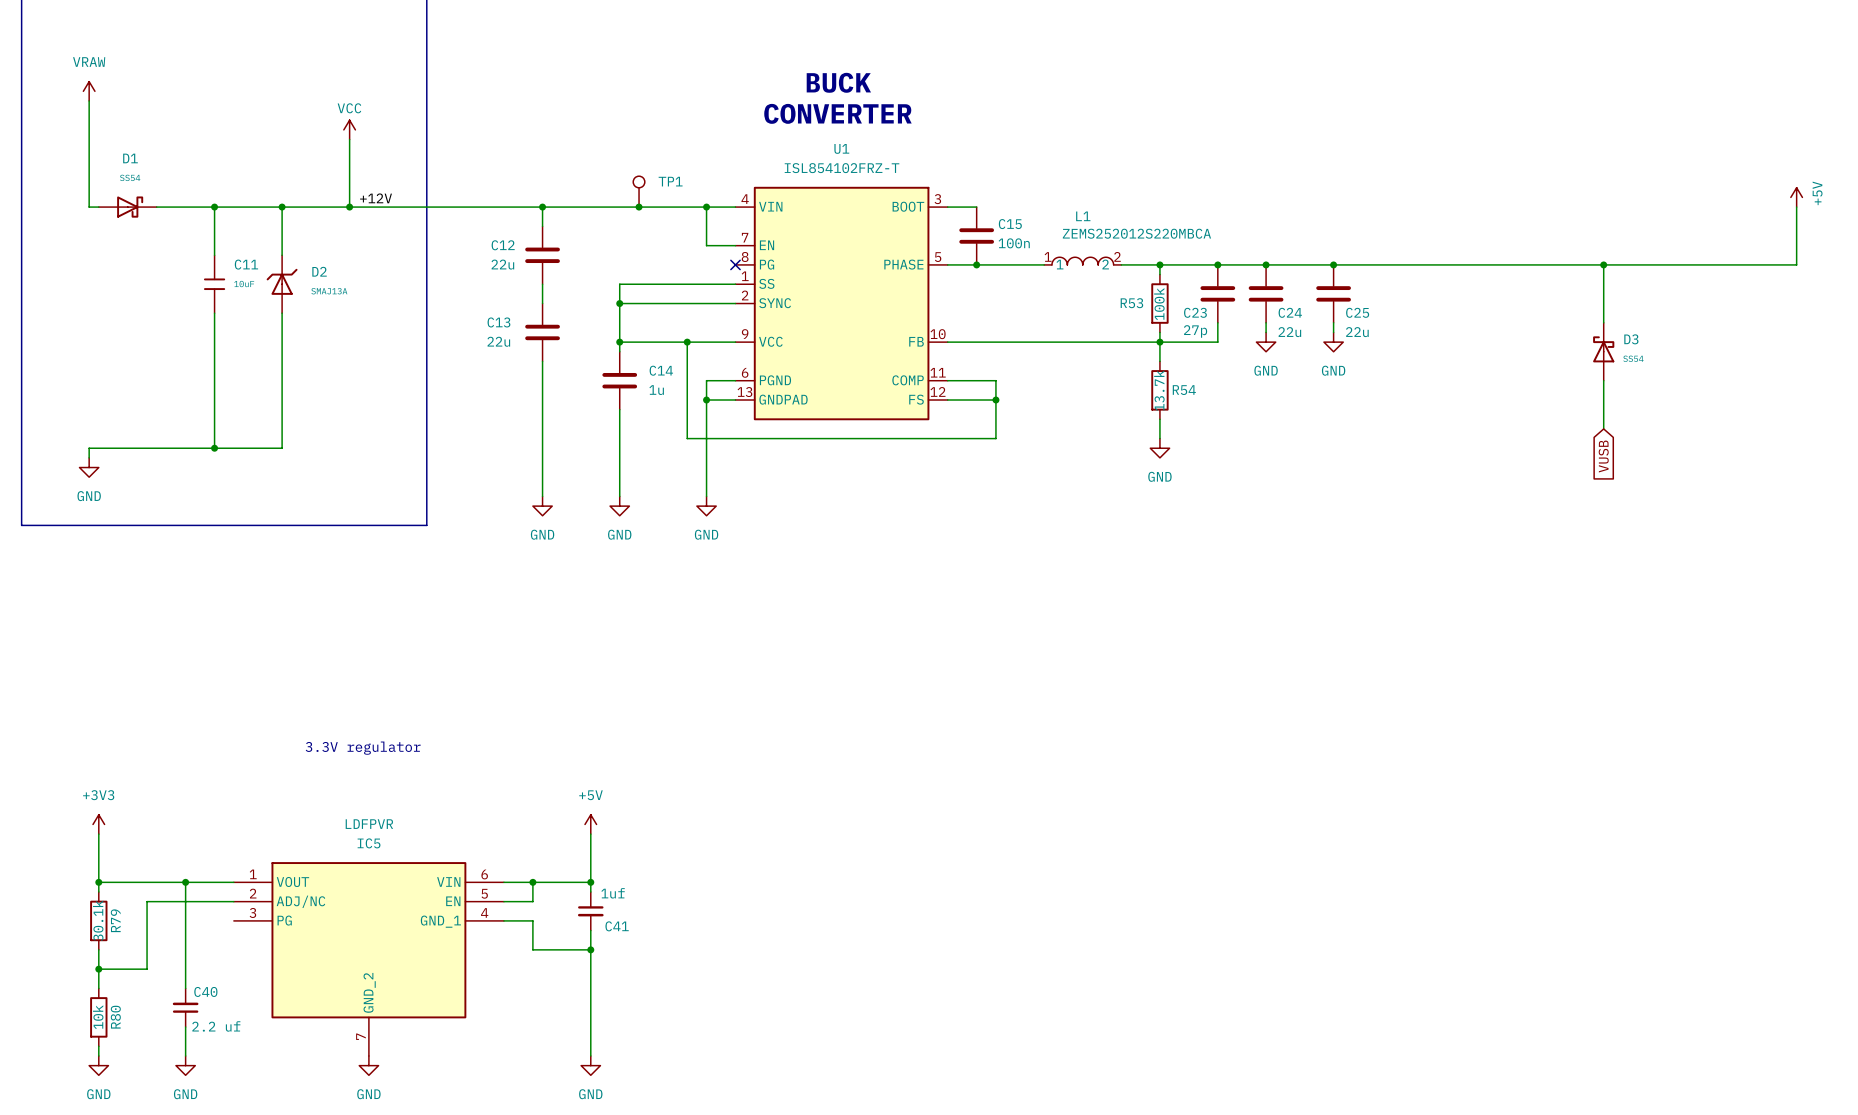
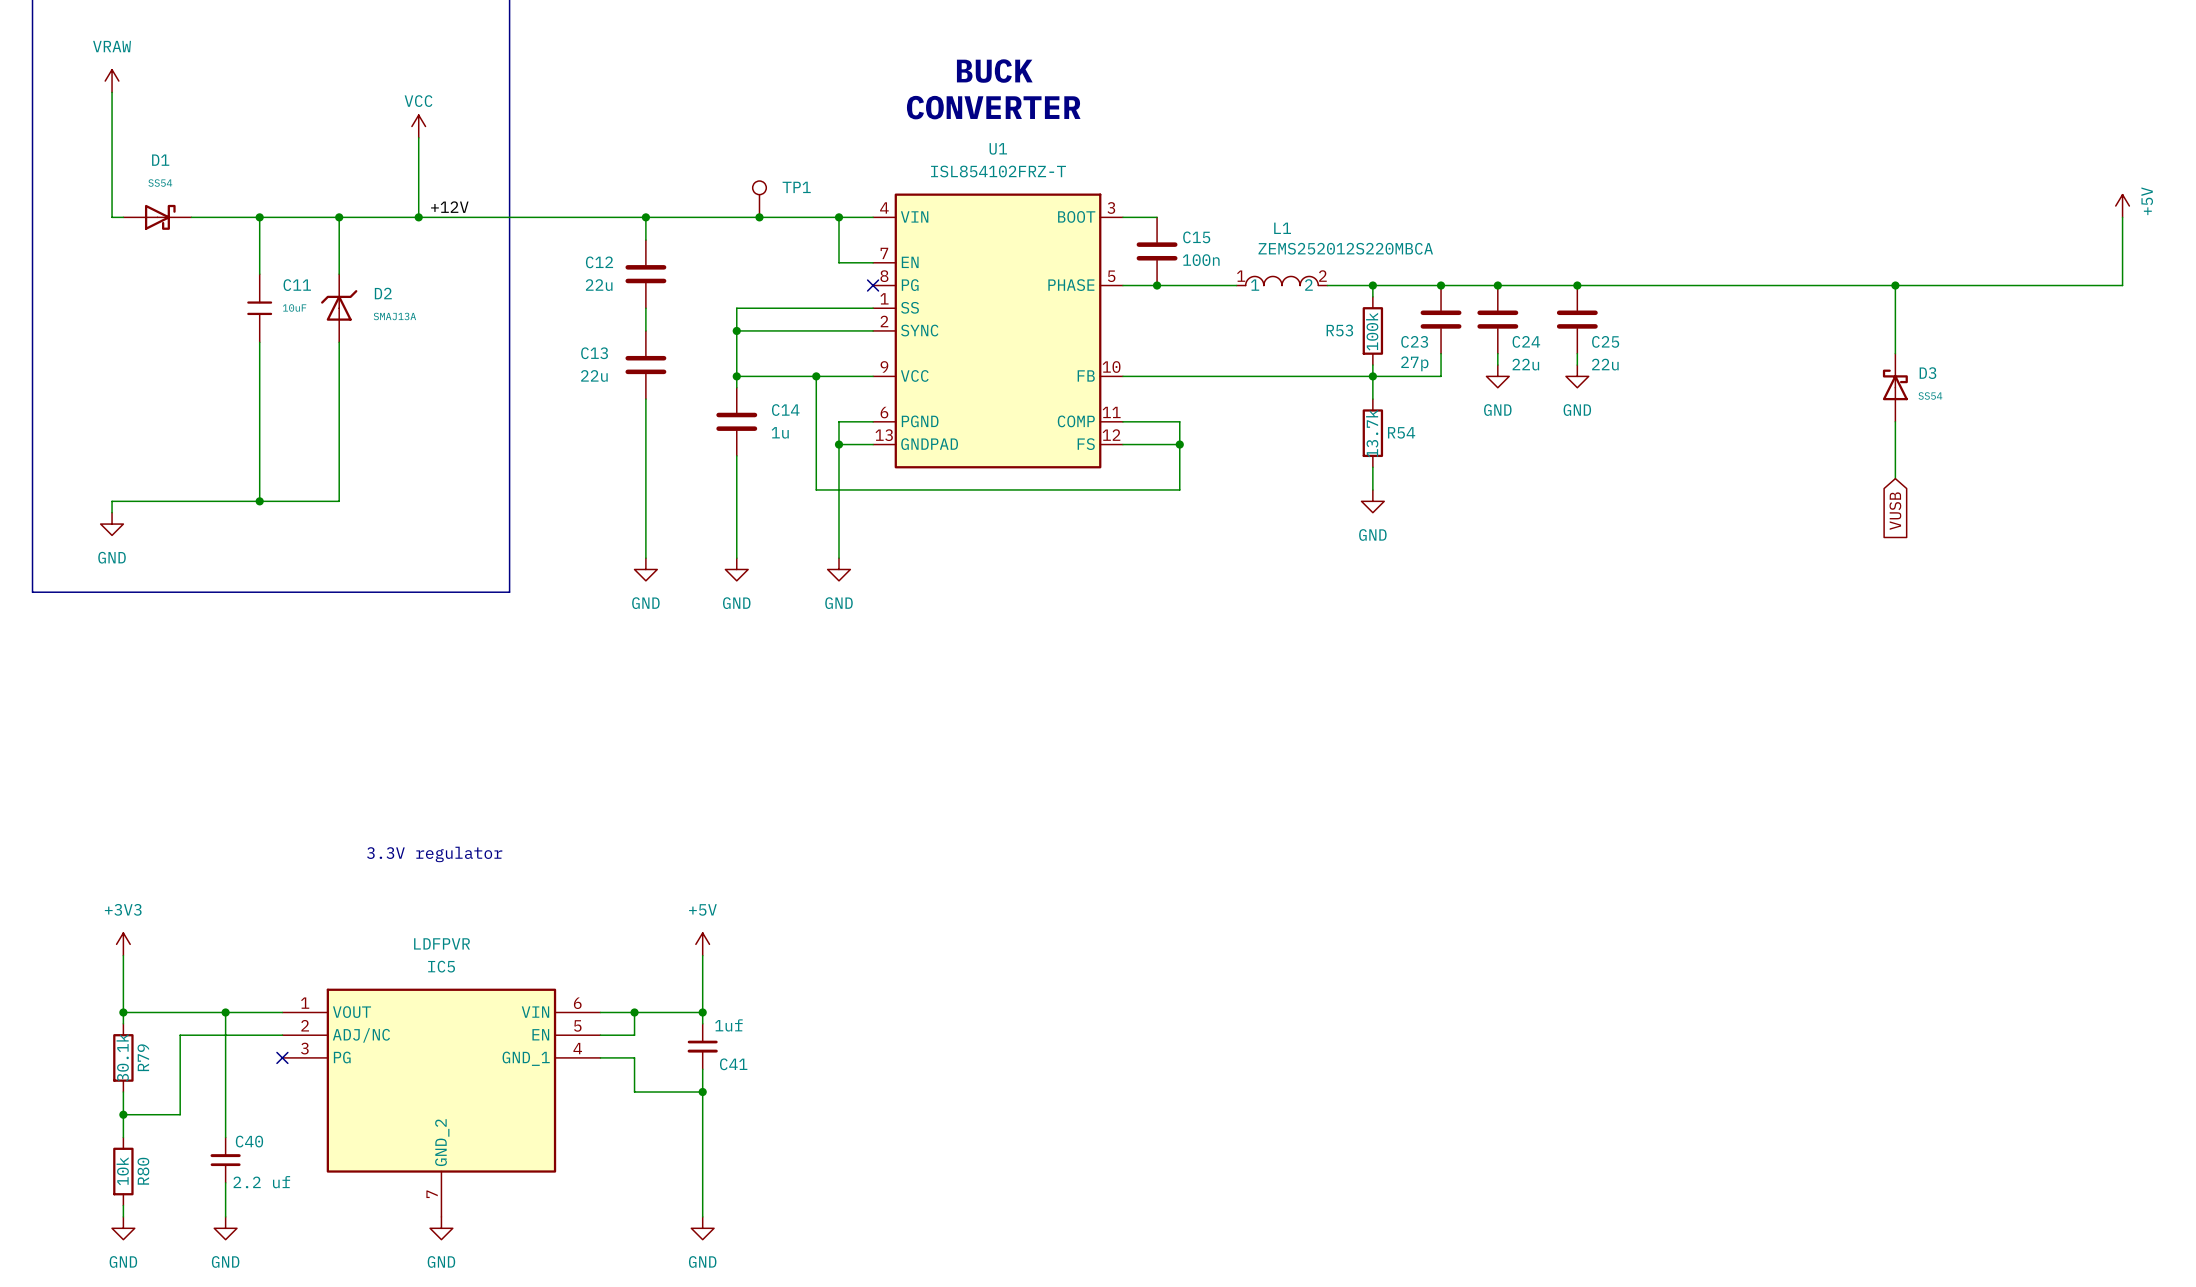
no-connect mark: none -> (282, 1057)

